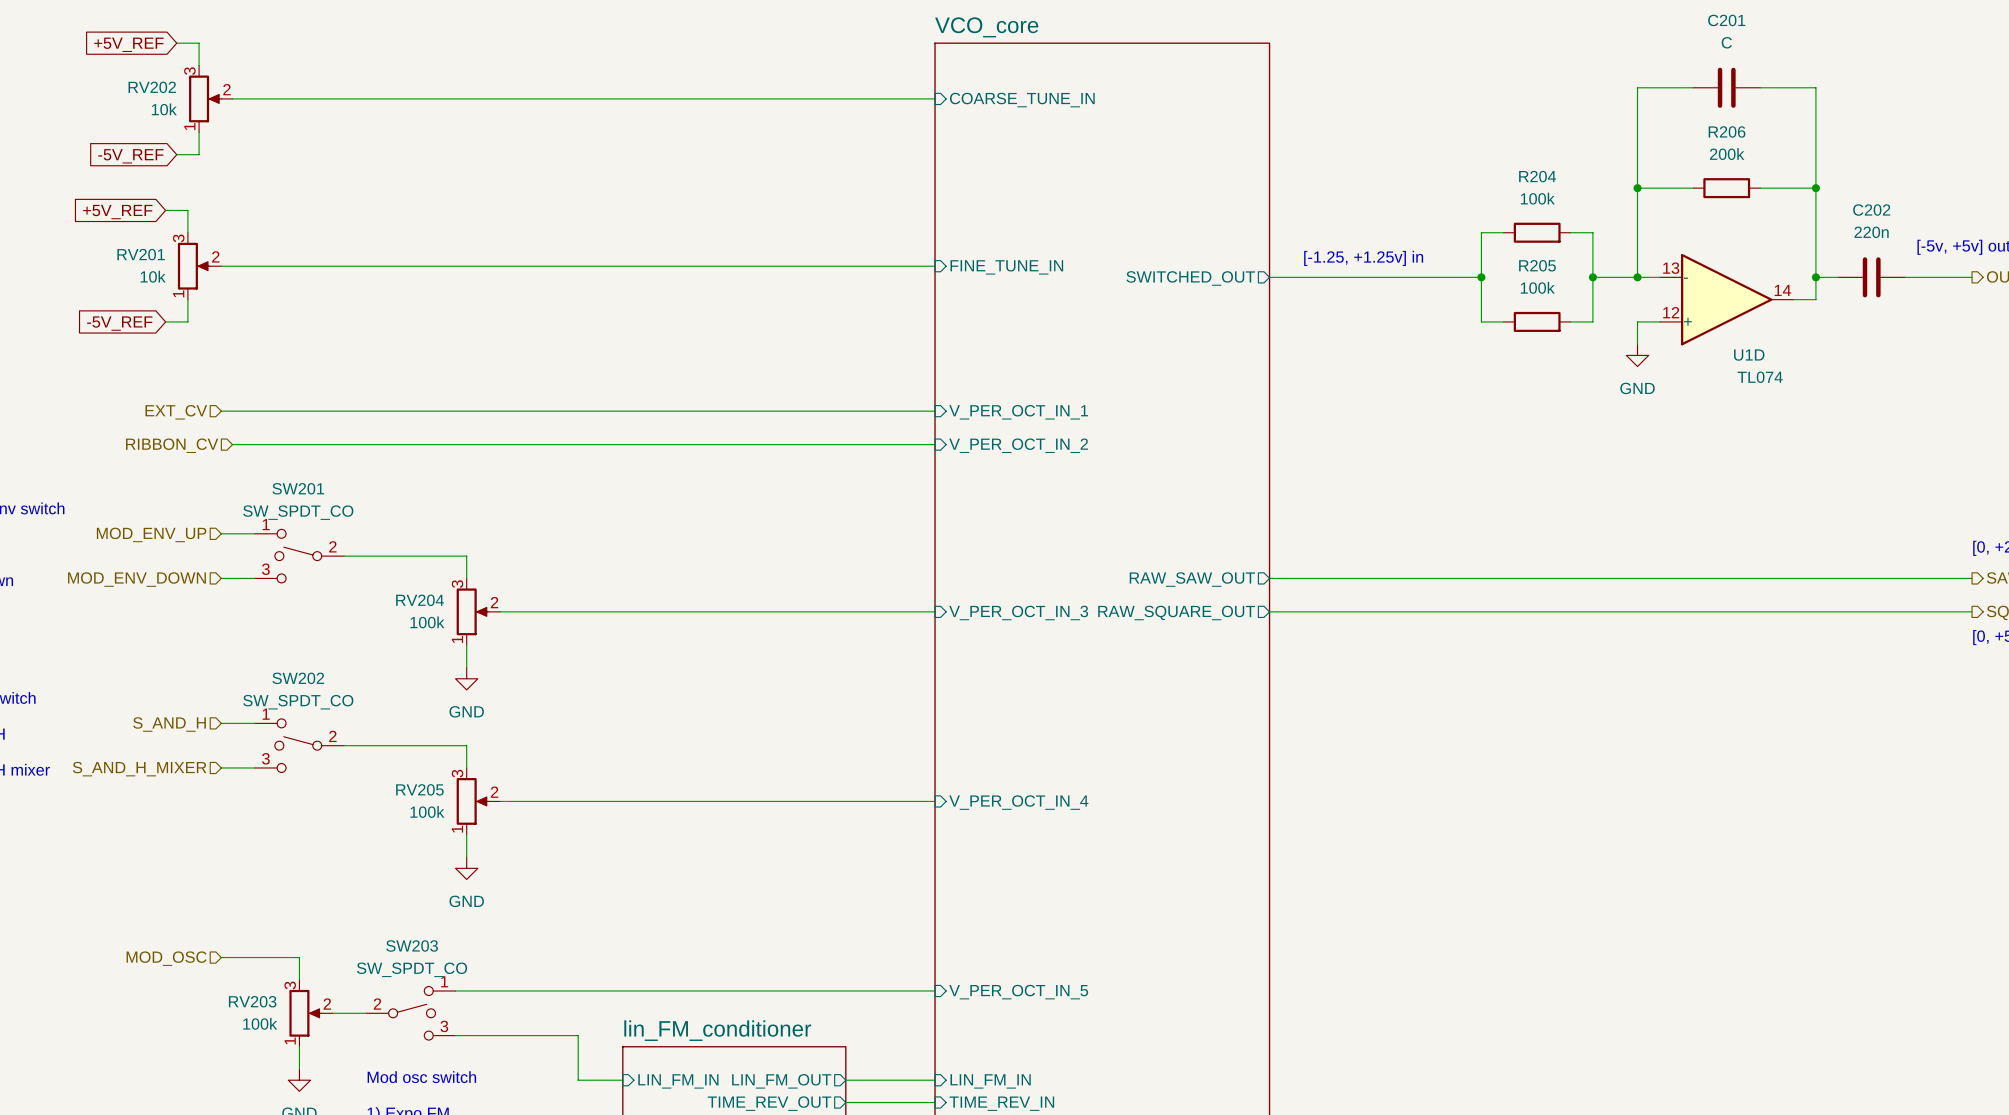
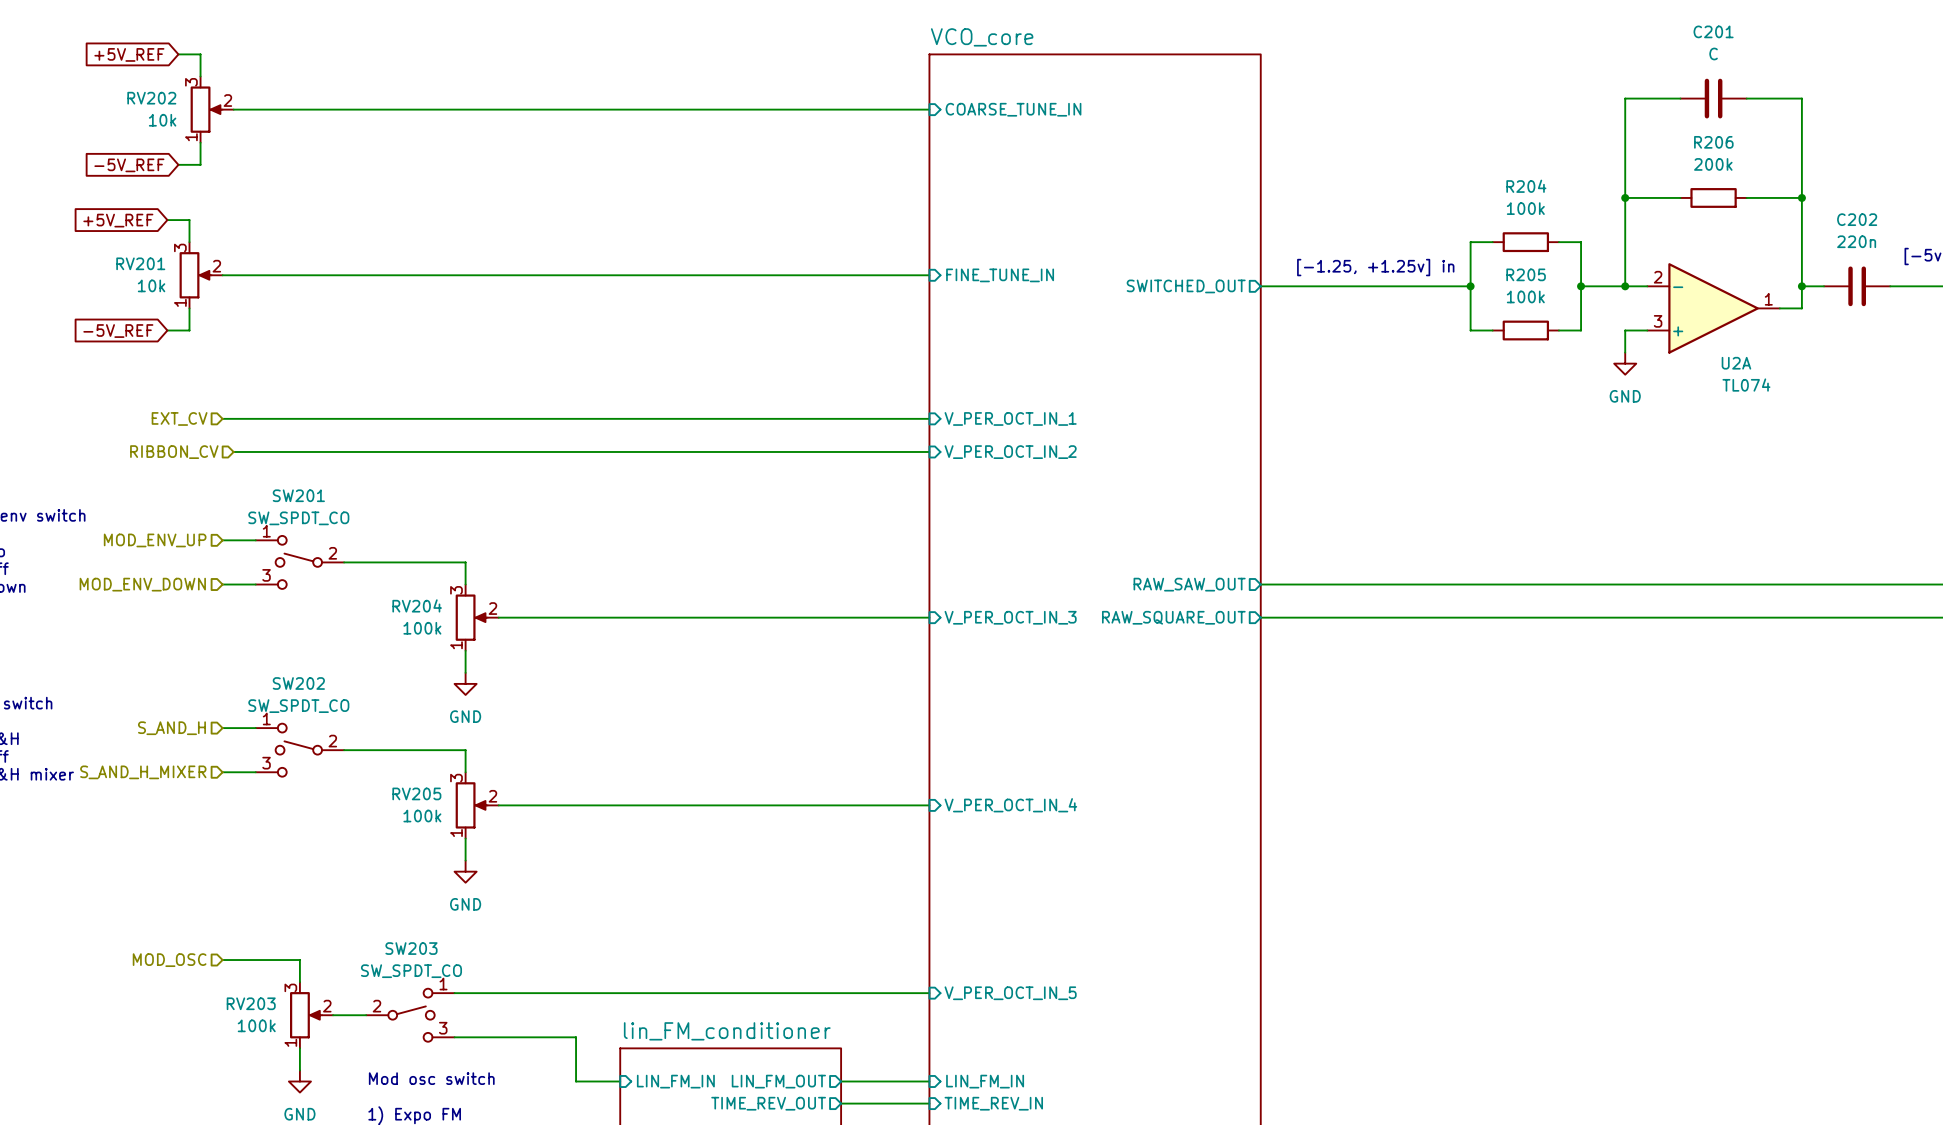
U1D pin number: 13 (1671, 268) -> 2 (1658, 277)
U1D pin number: 14 (1782, 290) -> 1 (1768, 299)
U1D pin number: 12 (1671, 312) -> 3 (1658, 321)
U1D name: U1D (1749, 355) -> U2A (1736, 363)

